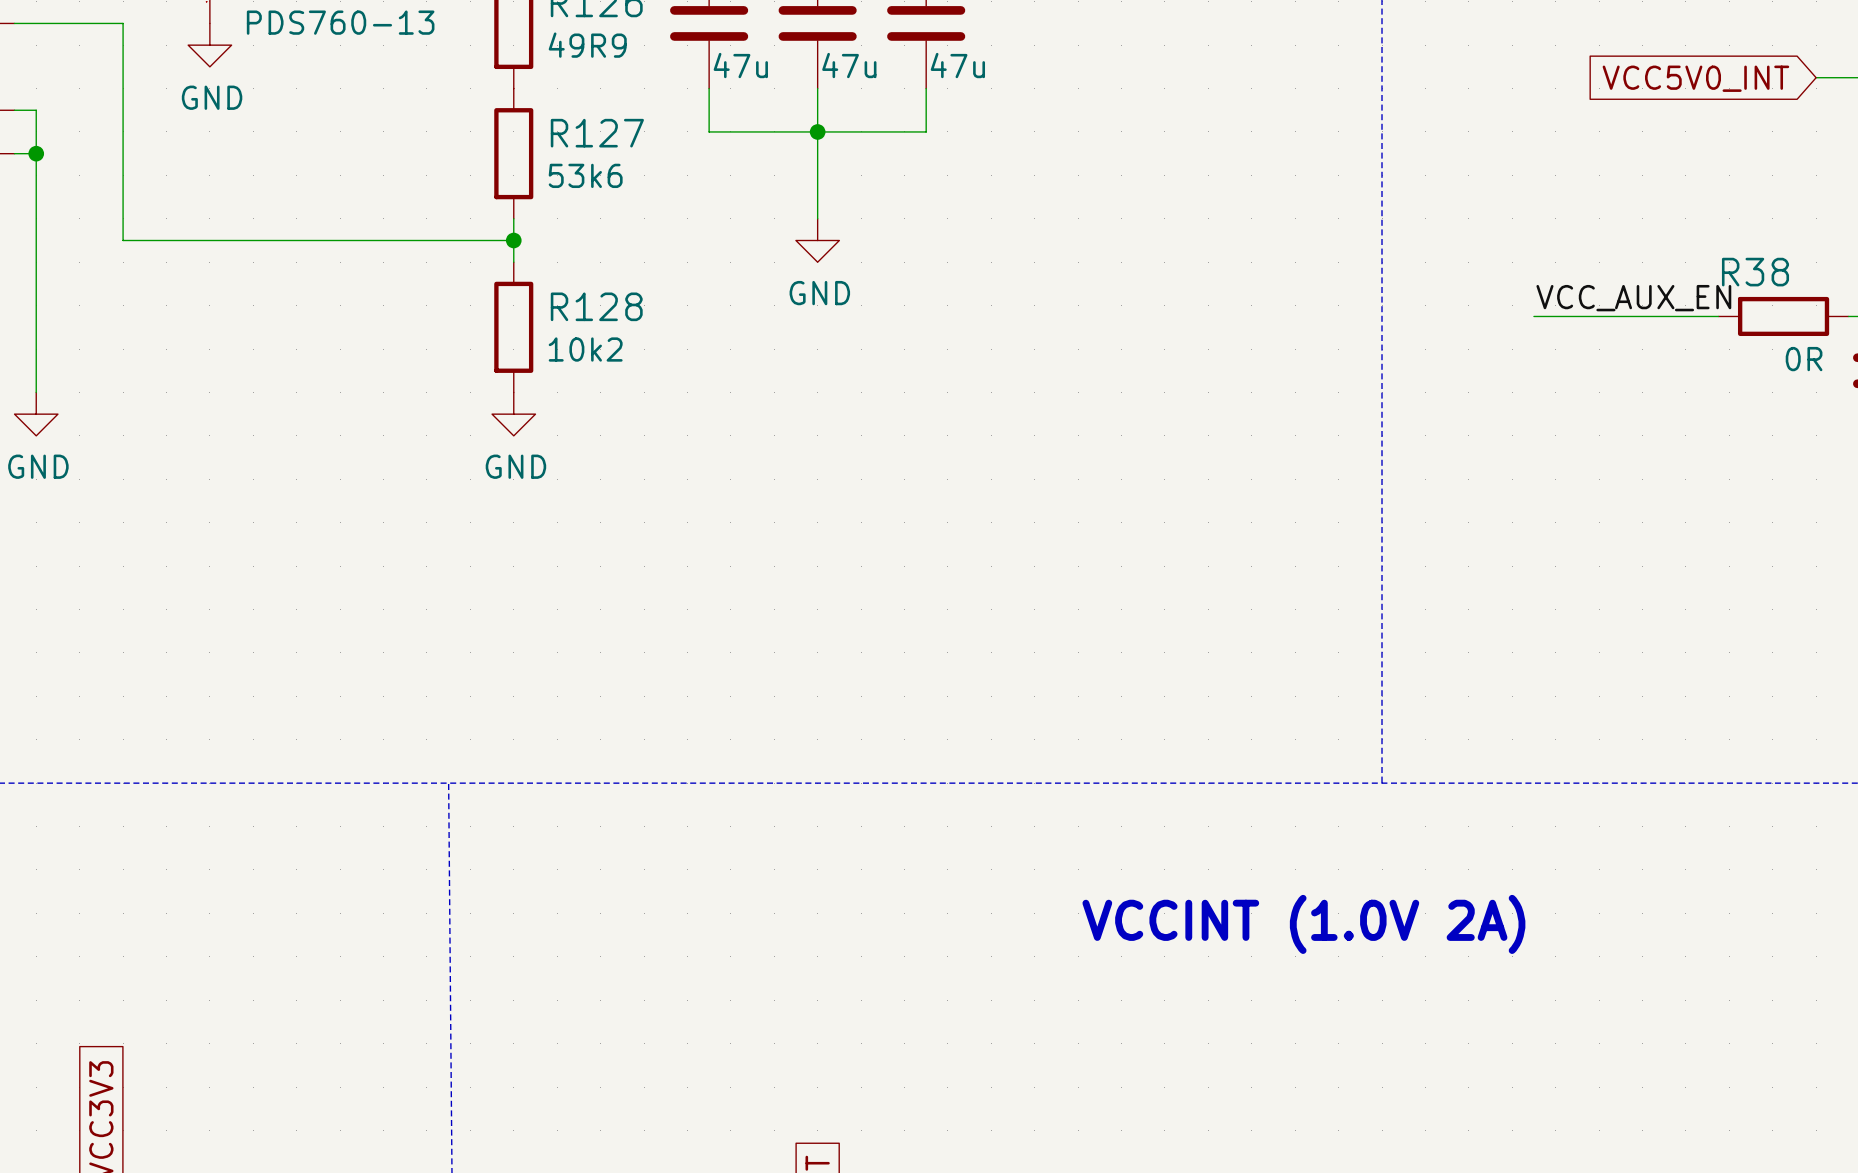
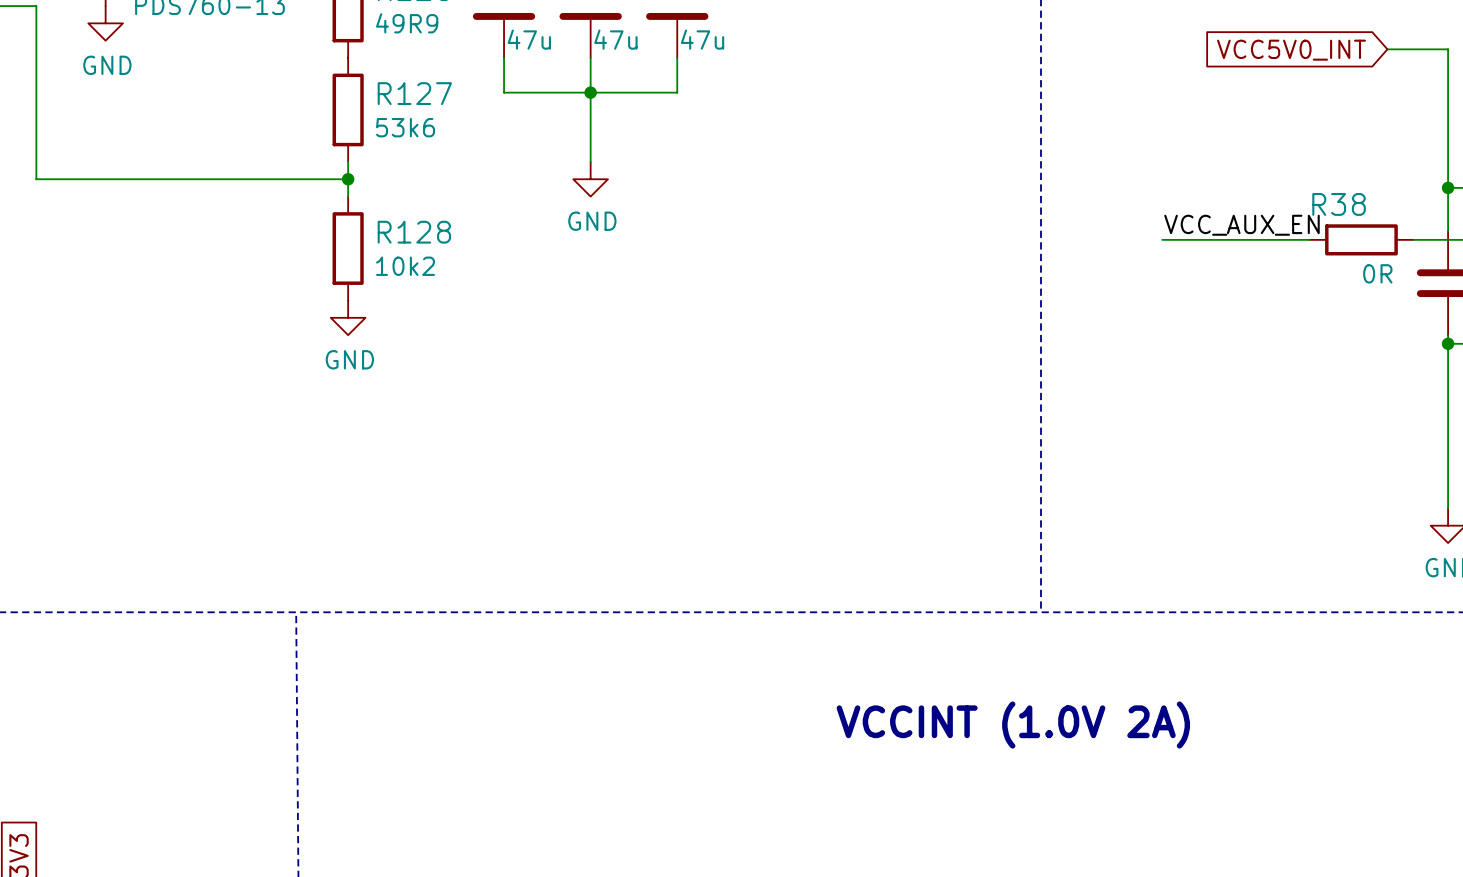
text position: VCCINT (1.0V 2A) (1303, 924) -> VCCINT (1.0V 2A) (1013, 725)

